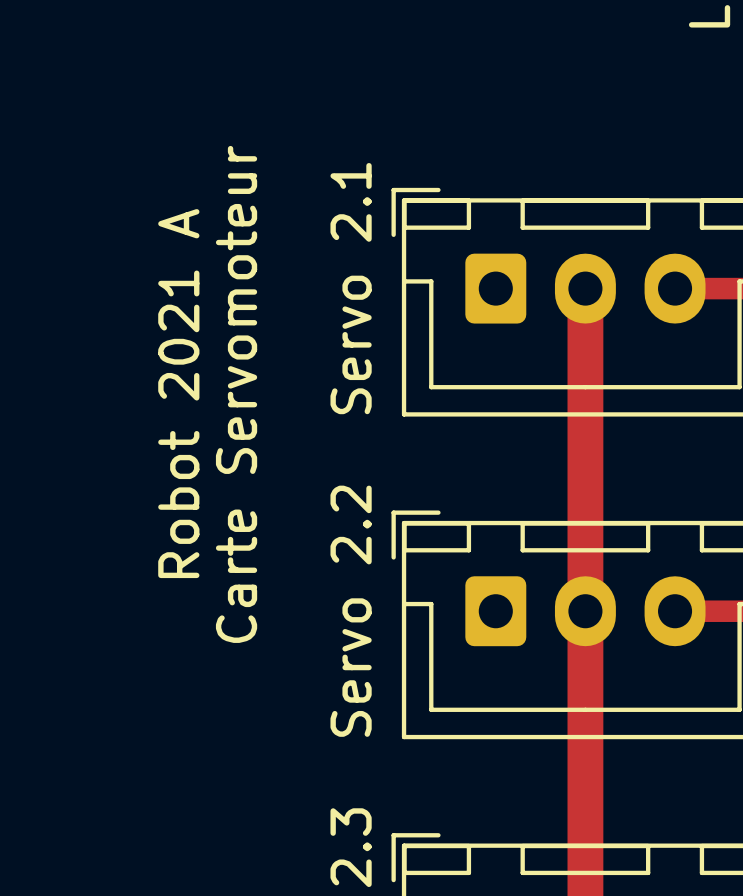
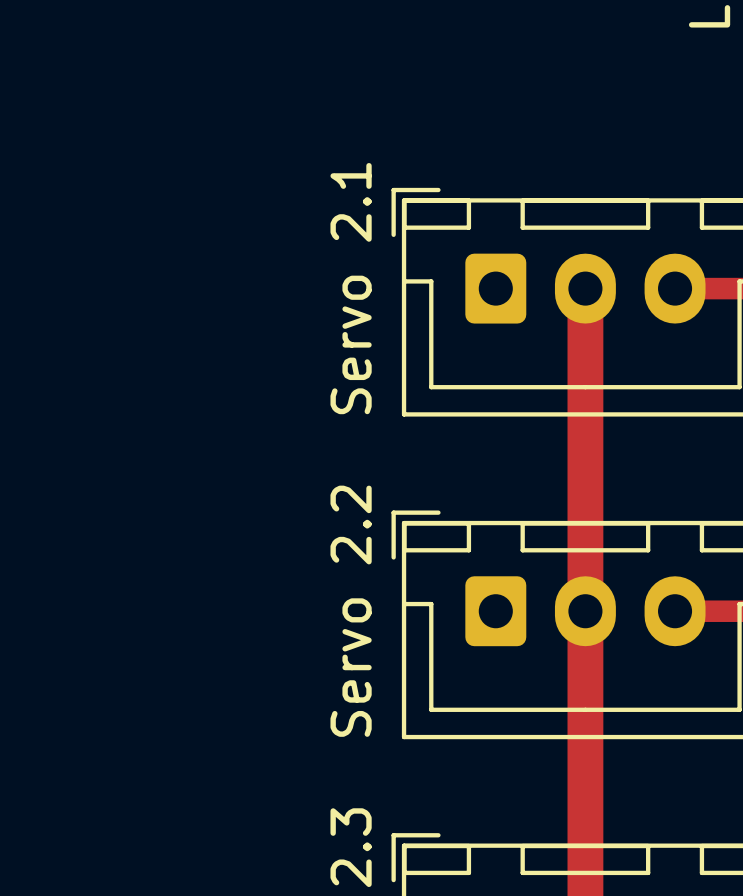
text: Robot 2021 A (178, 393) -> none
text: Carte Servomoteur (236, 394) -> none

